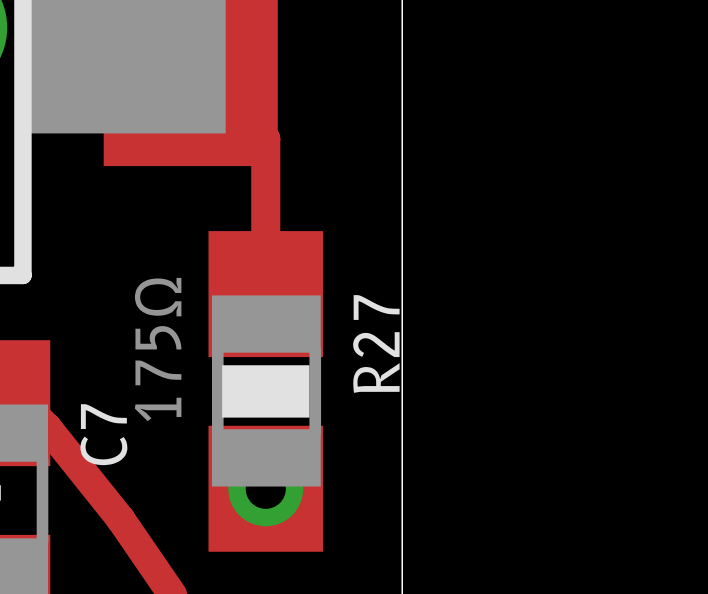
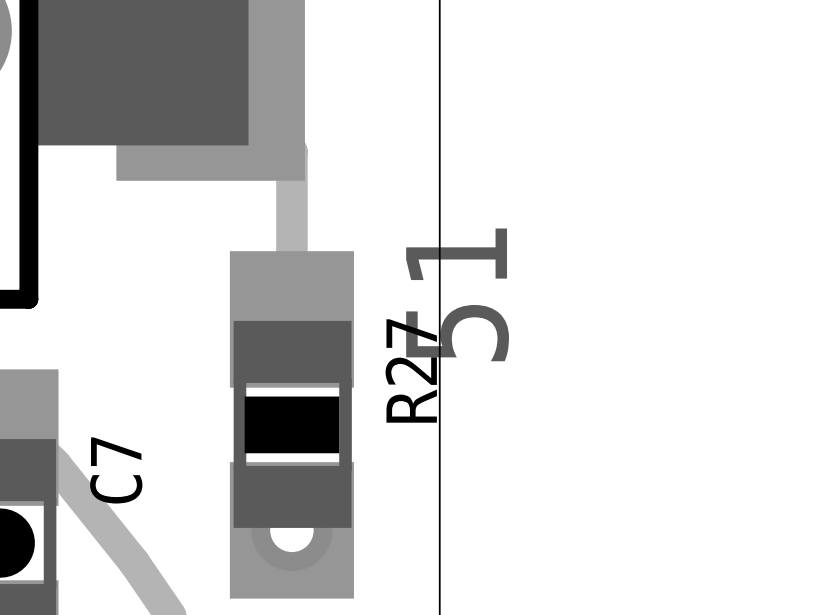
R27 value: 175Ω (158, 349) -> 51 (457, 294)

